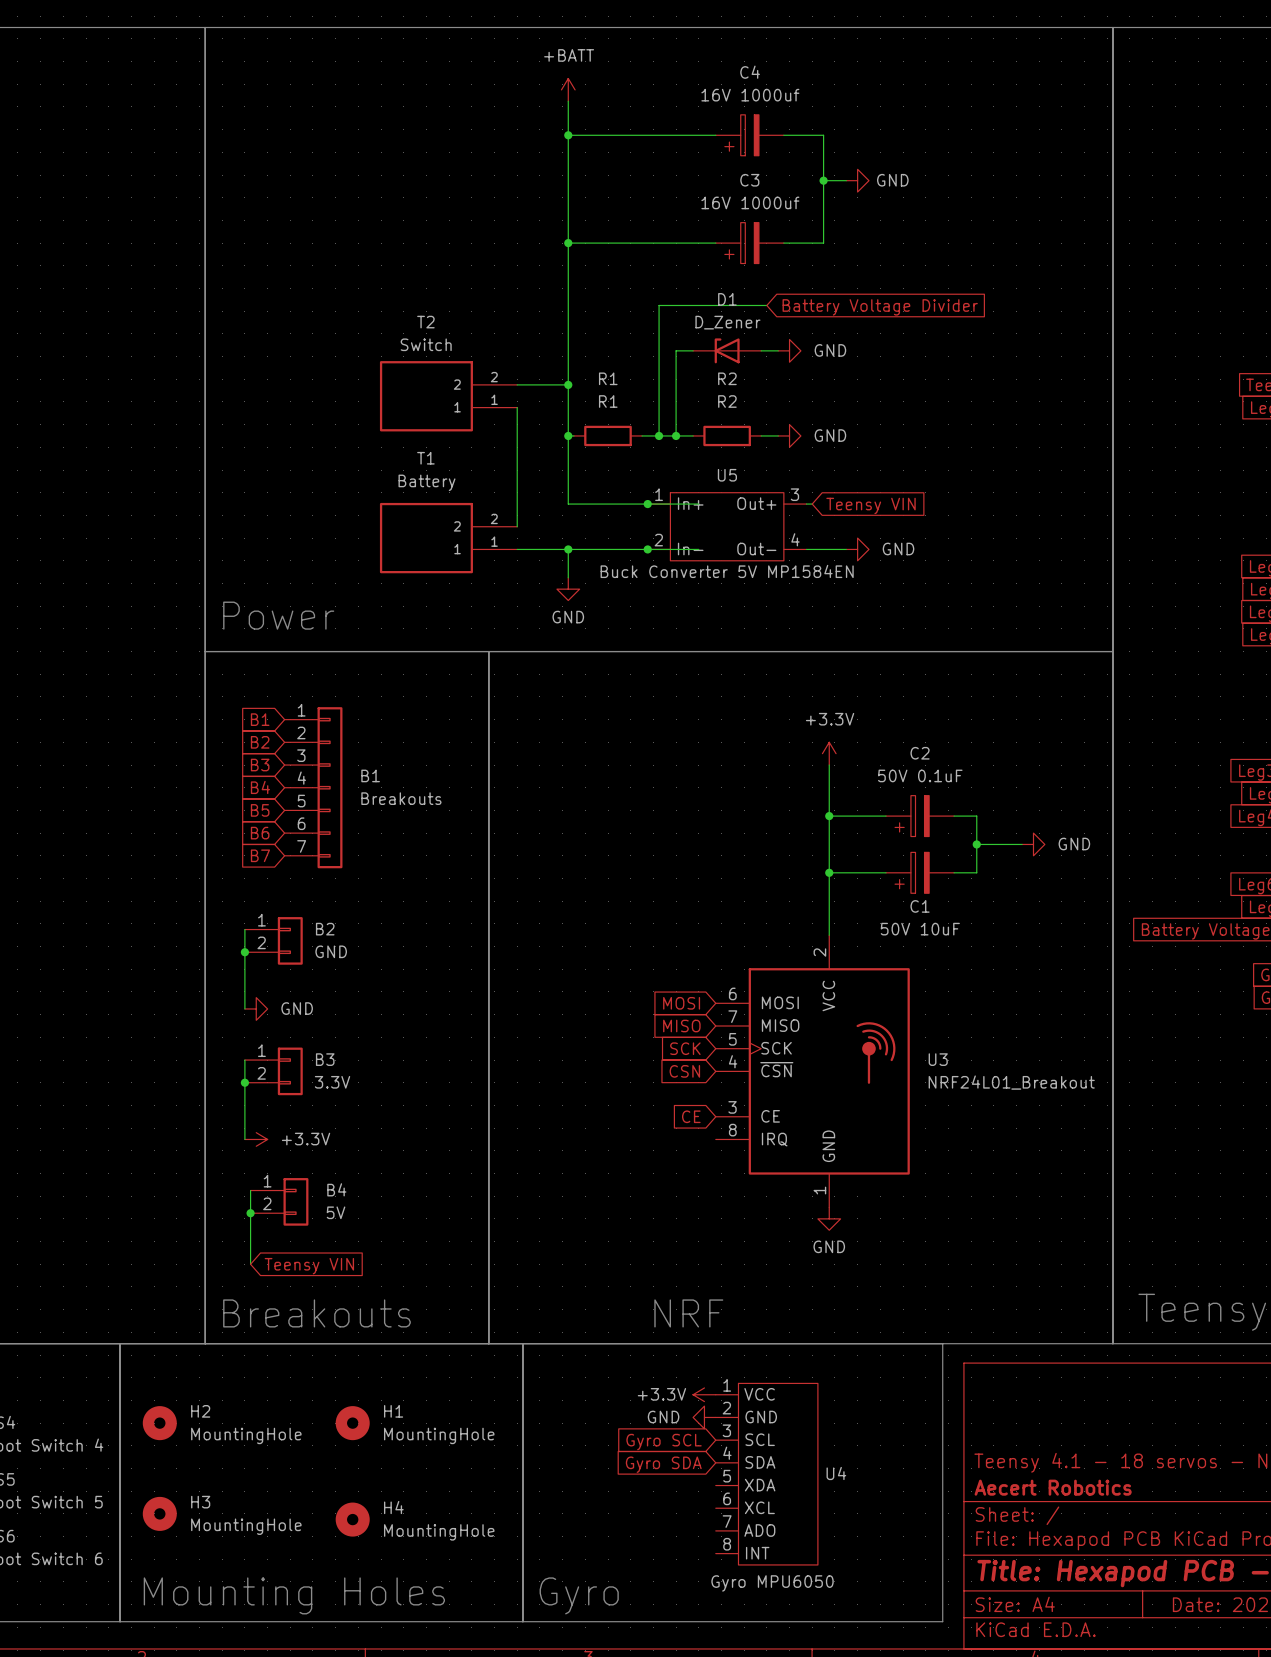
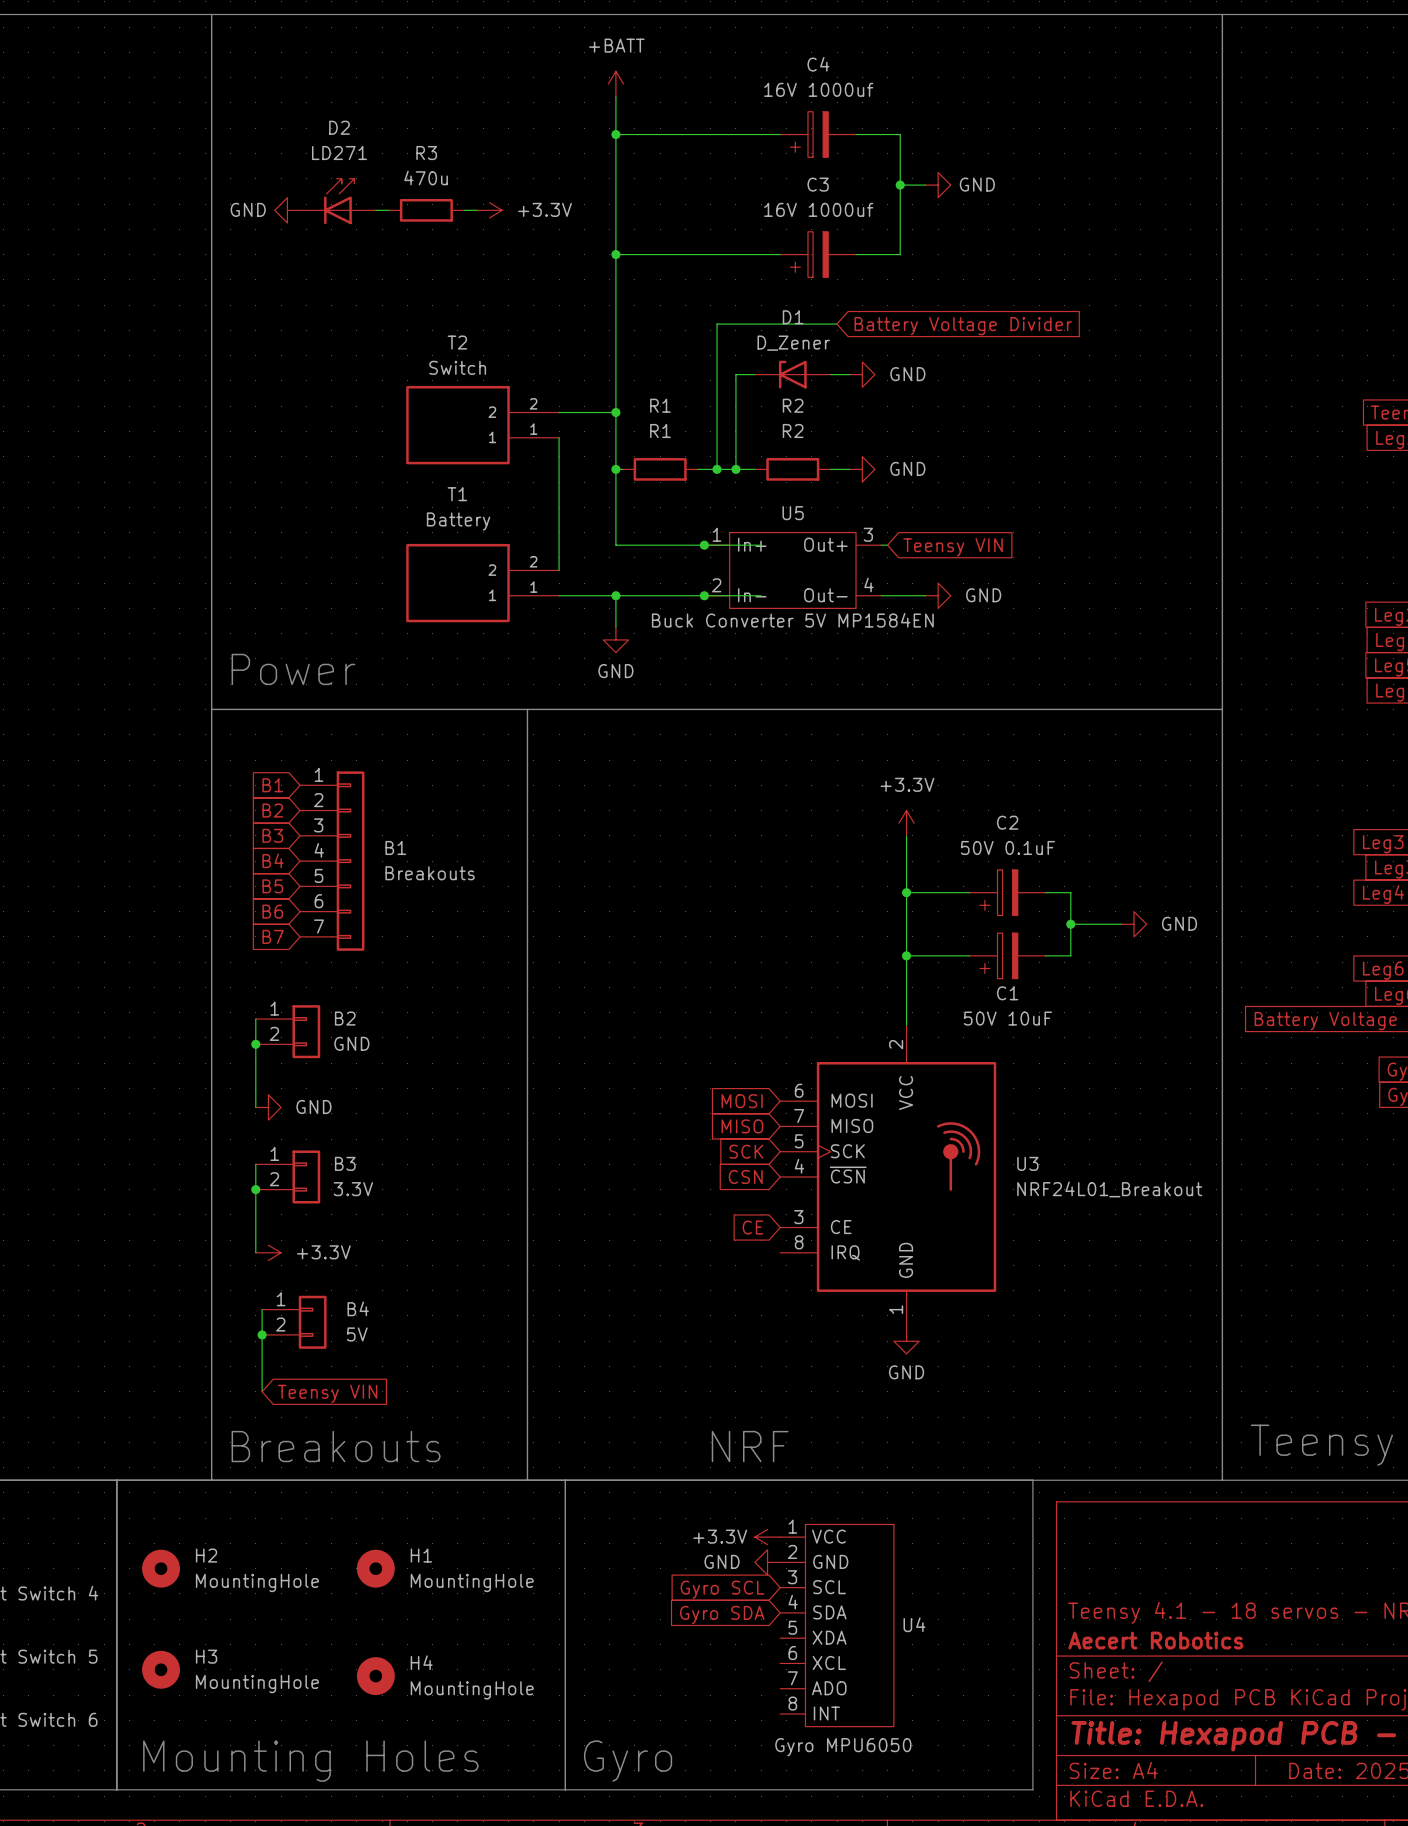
D2: none -> LD271 (337, 201)
power symbol: none -> GND (287, 210)
wire: none -> (375, 210) (388, 210)
R3: none -> 470u (426, 210)
wire: none -> (464, 210) (476, 210)
power symbol: none -> +3.3V (489, 210)

